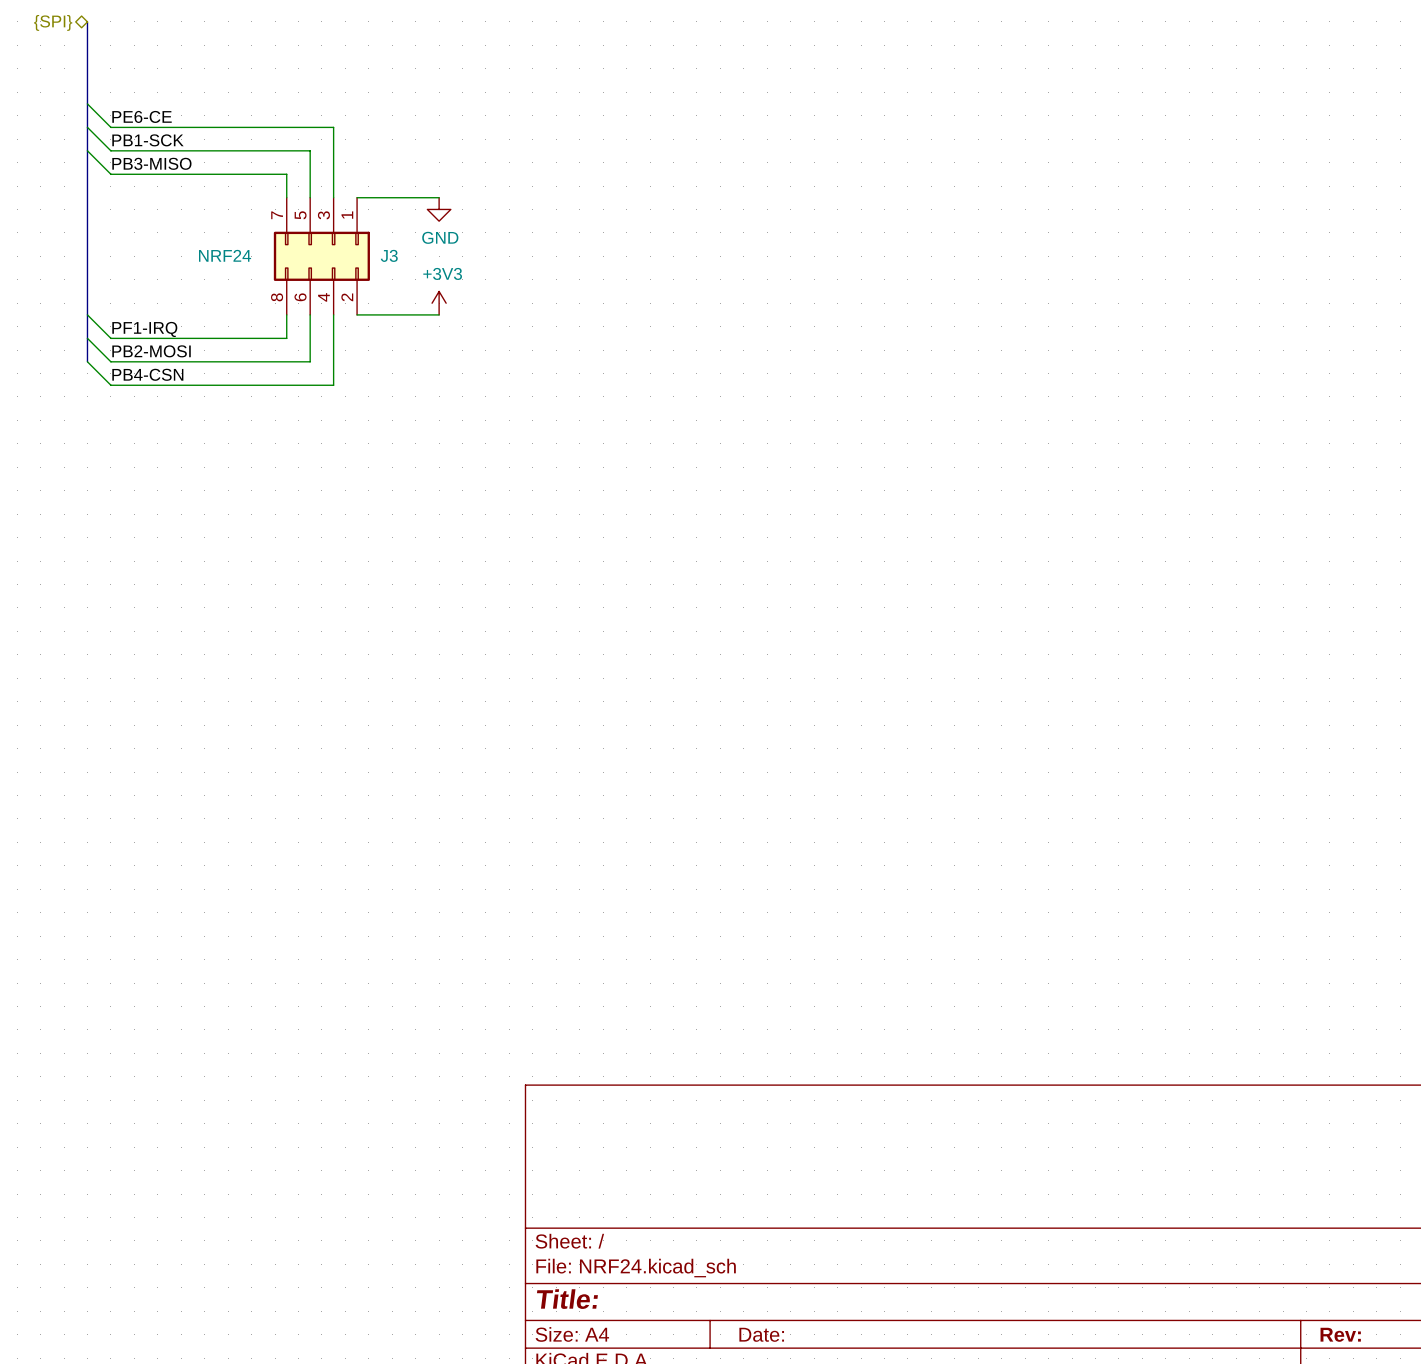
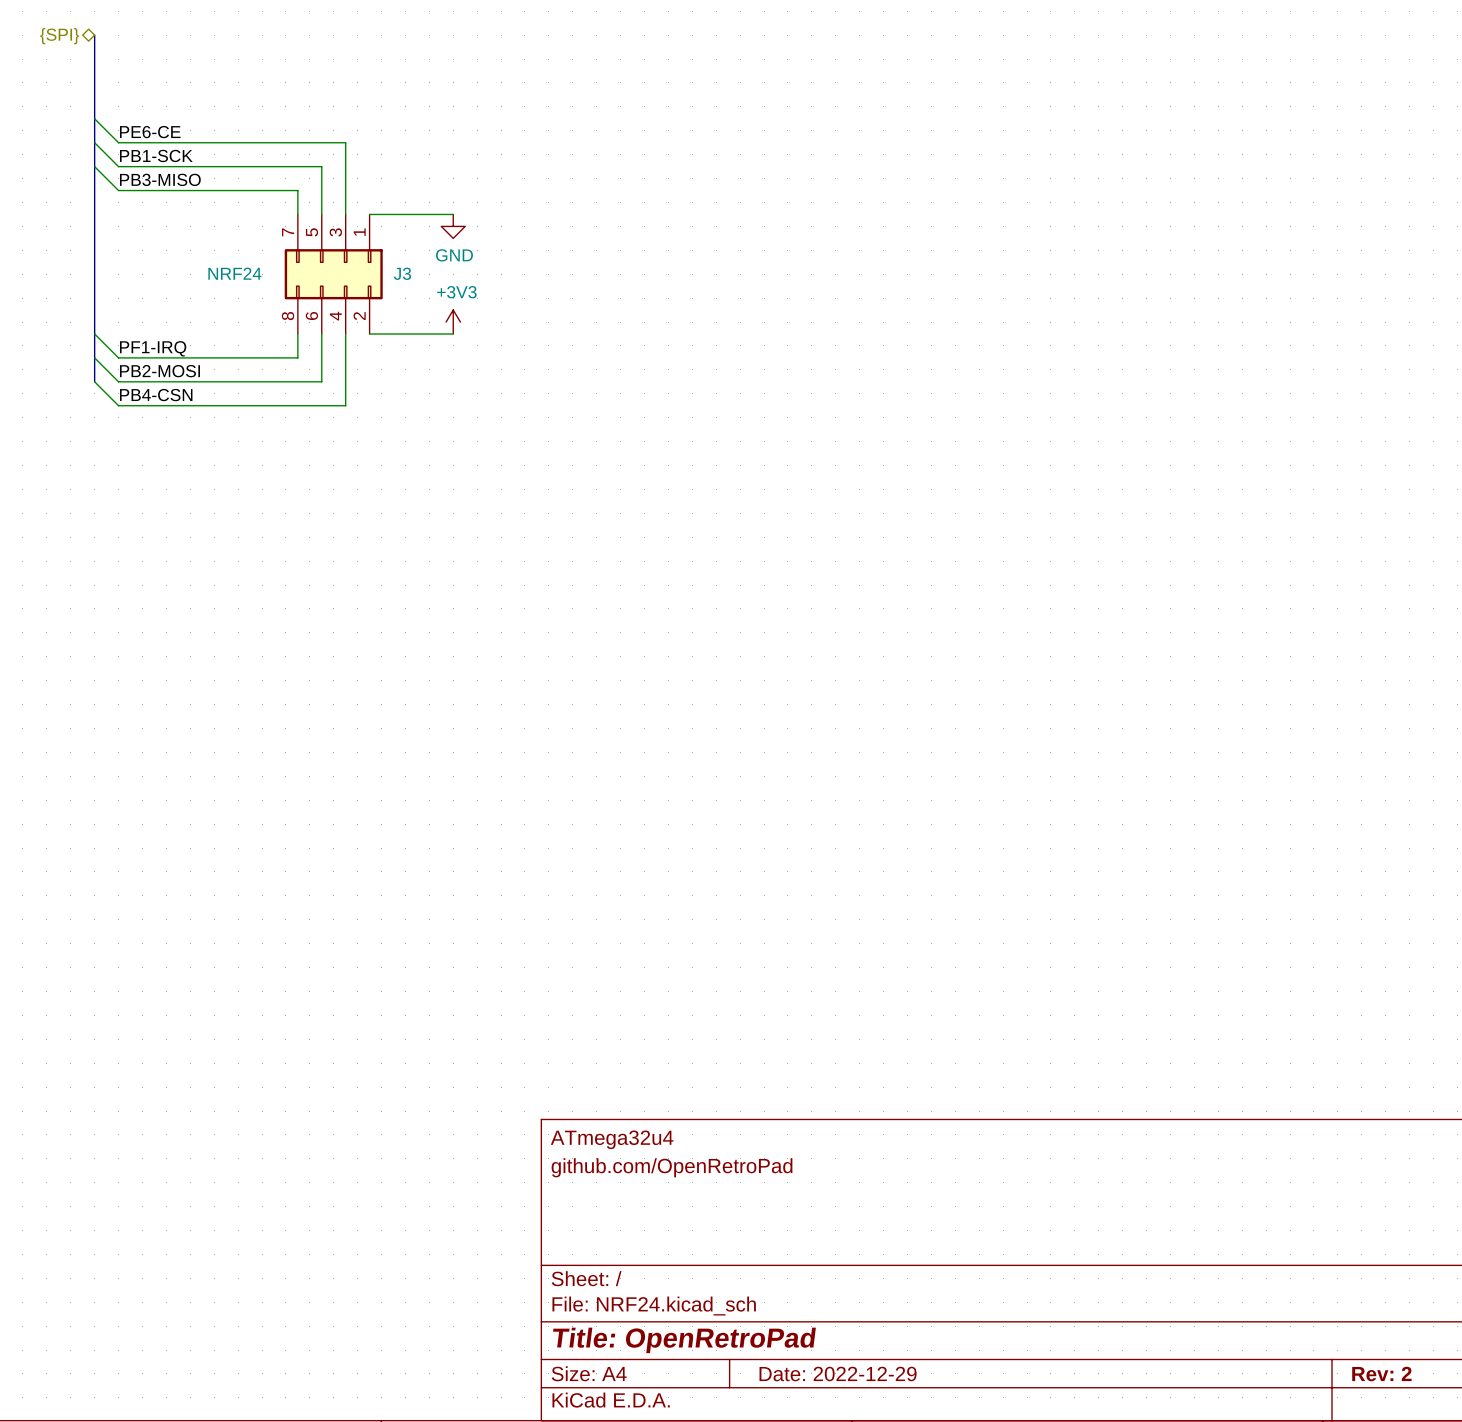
title block: none -> ATmega32u4 (612, 1139)
title block: none -> github.com/OpenRetroPad (672, 1167)
title block: Title: (567, 1299) -> Title: OpenRetroPad (684, 1340)
title block: Date: (761, 1334) -> Date: 2022-12-29 (838, 1374)
title block: Rev: (1340, 1334) -> Rev: 2 (1381, 1374)

